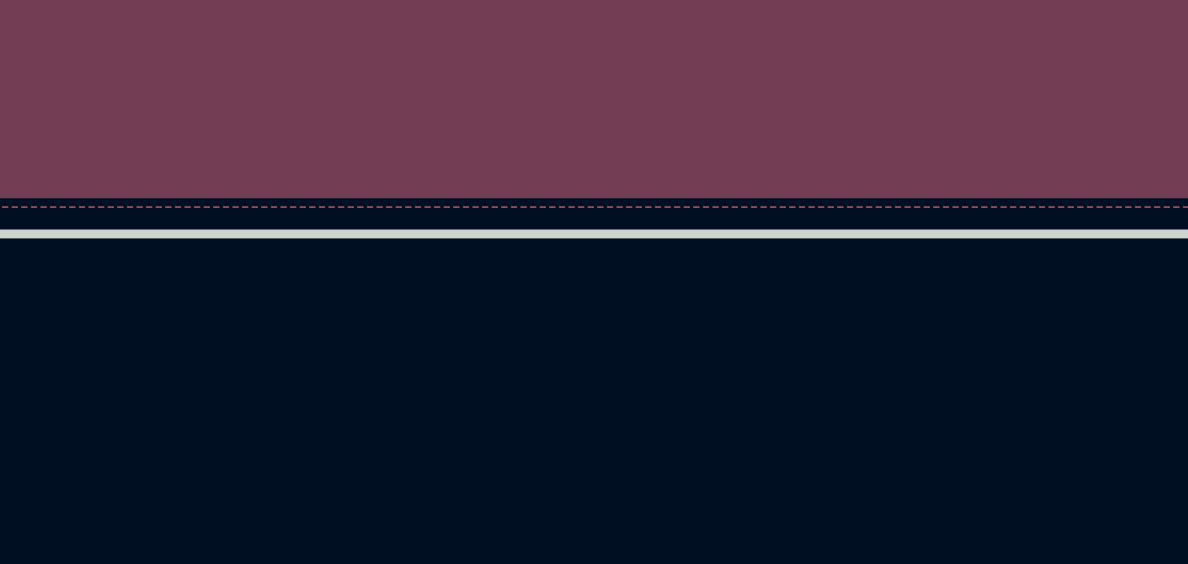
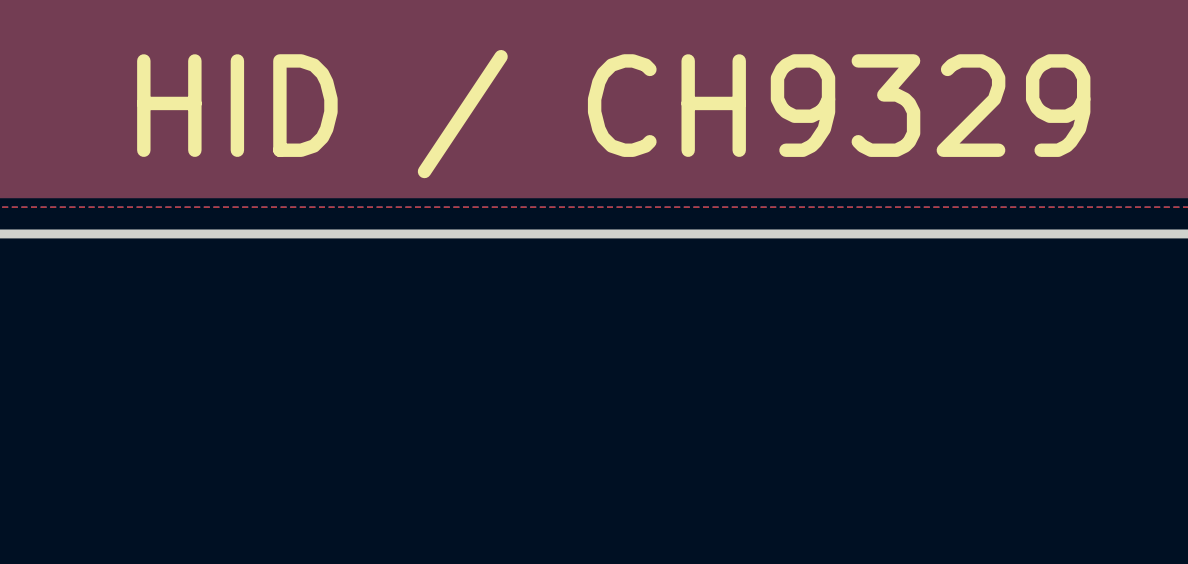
text: none -> HID / CH9329 (613, 114)

